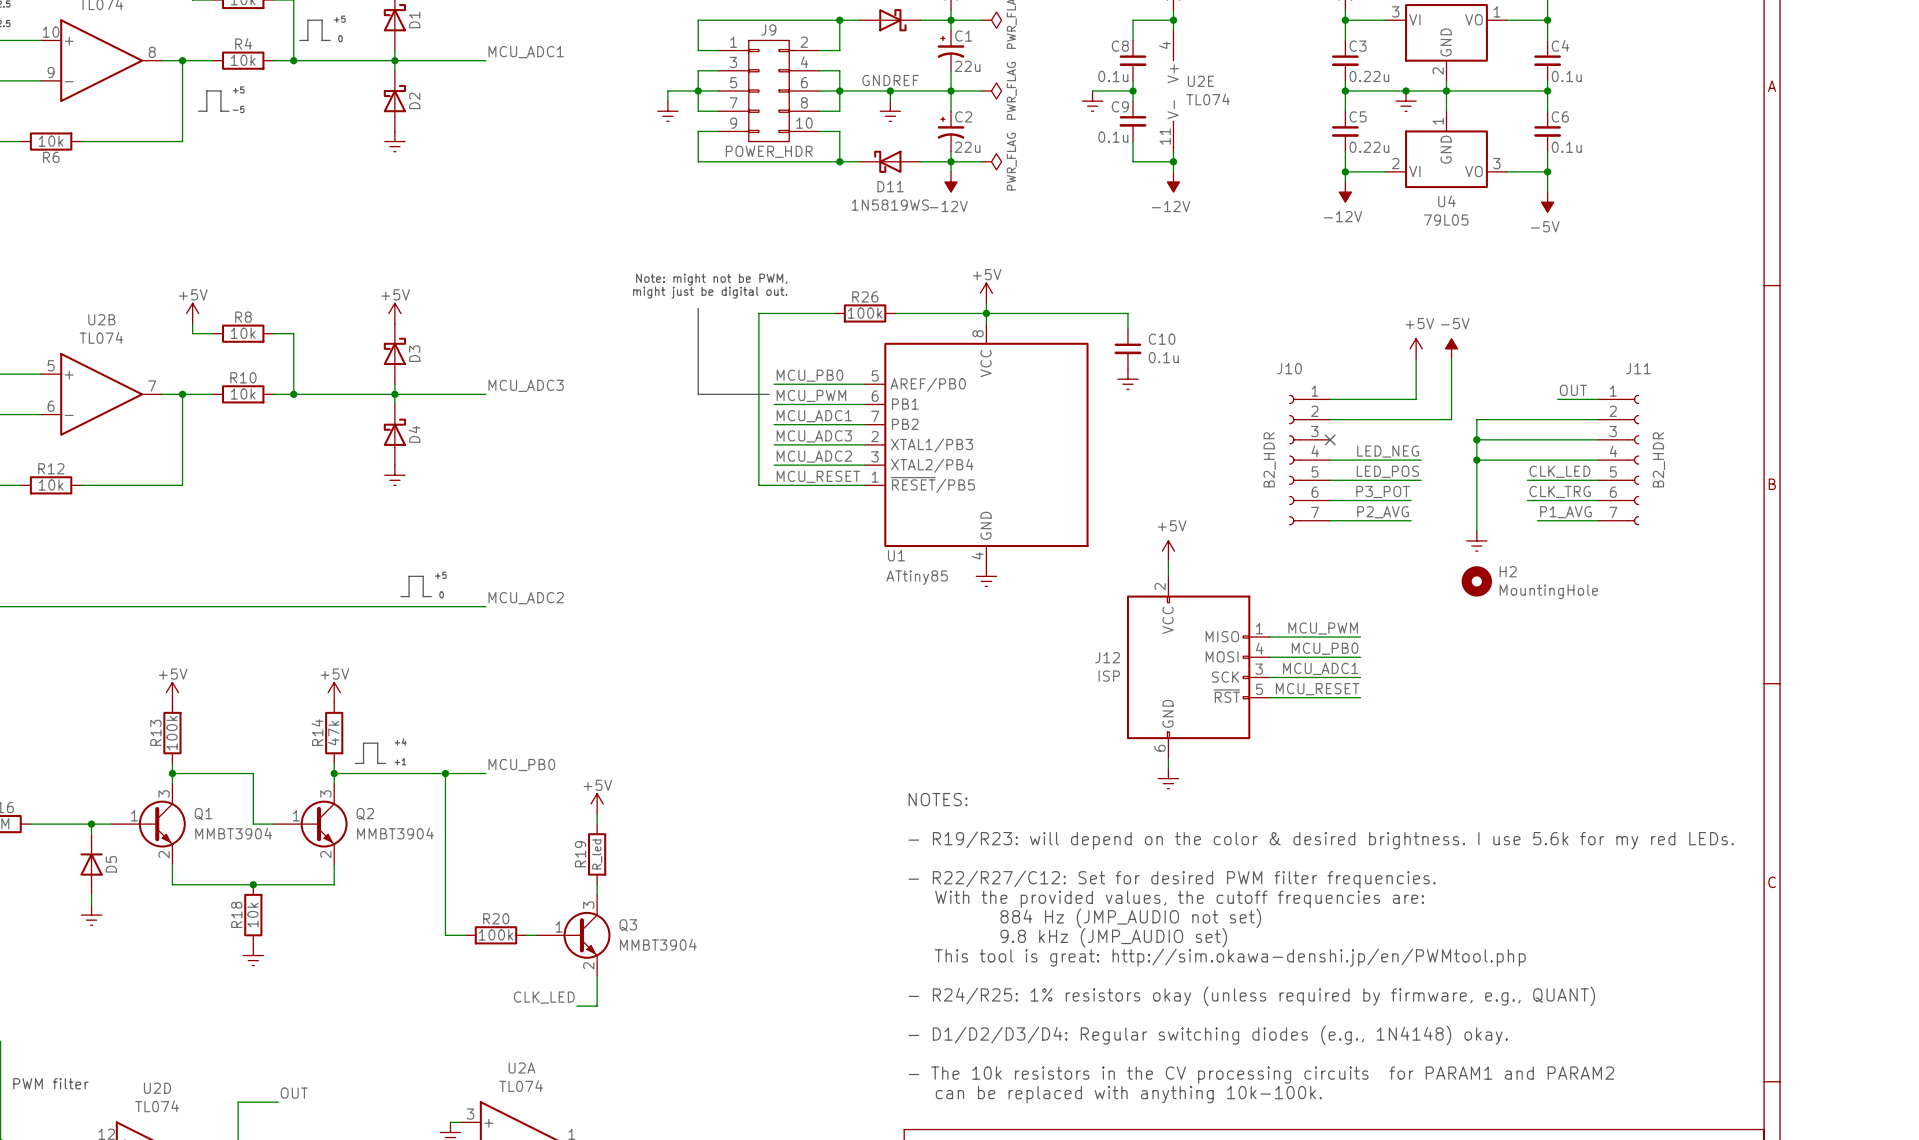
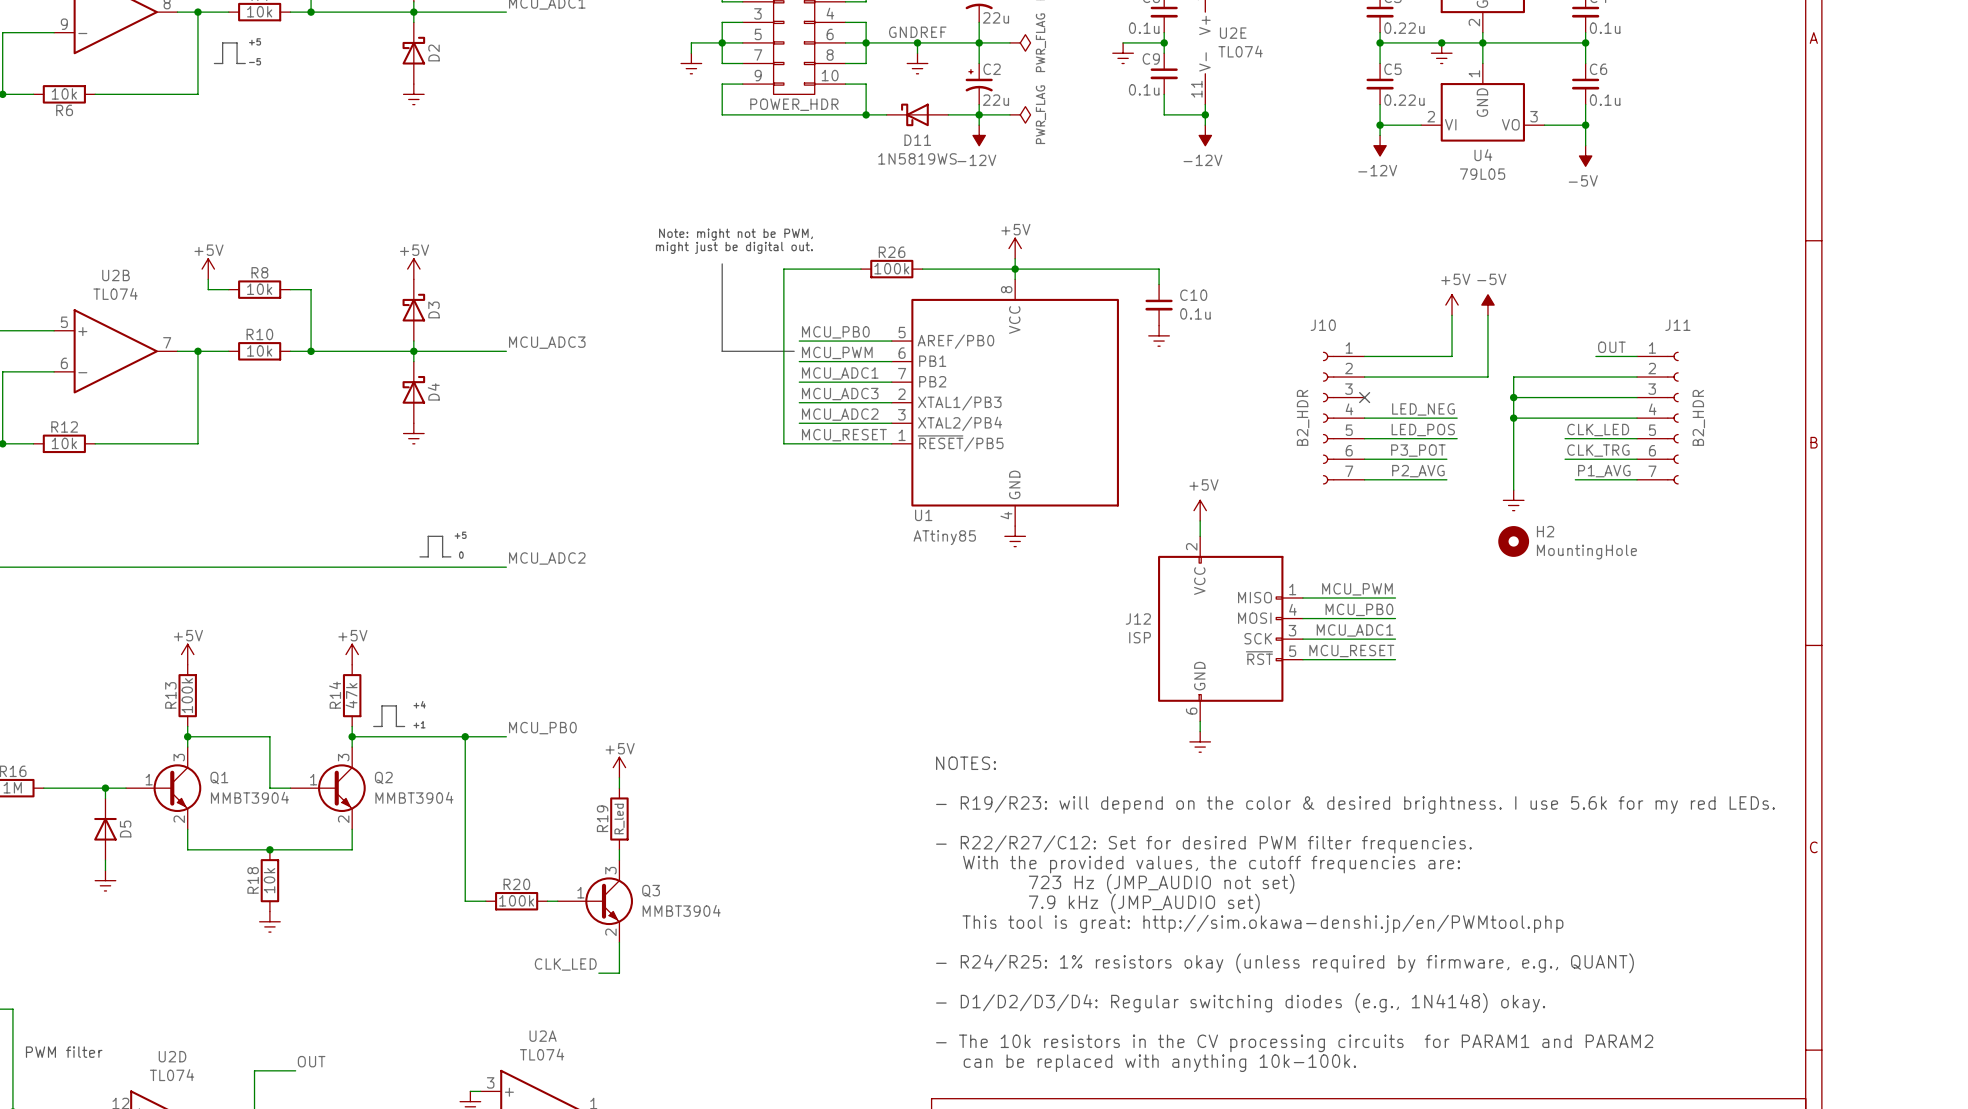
text: 884 Hz (JMP_AUDIO not set) (1130, 918) -> 723 Hz (JMP_AUDIO not set) (1161, 883)
text: 9.8 kHz (JMP_AUDIO set) (1113, 937) -> 7.9 kHz (JMP_AUDIO set) (1144, 903)

